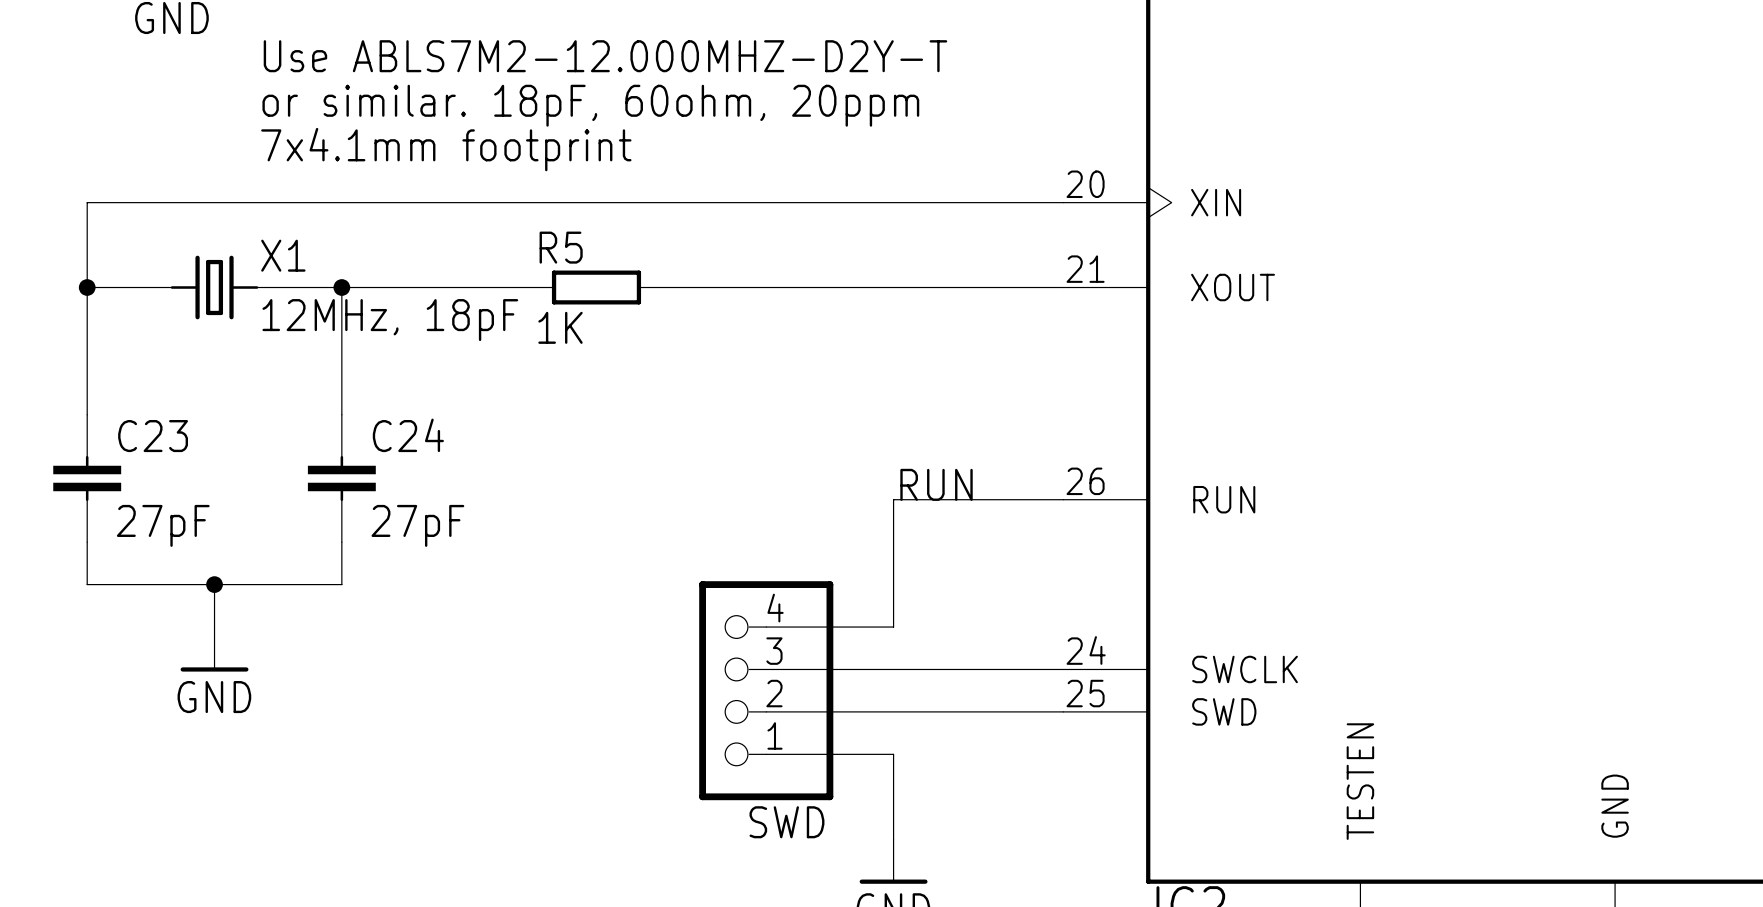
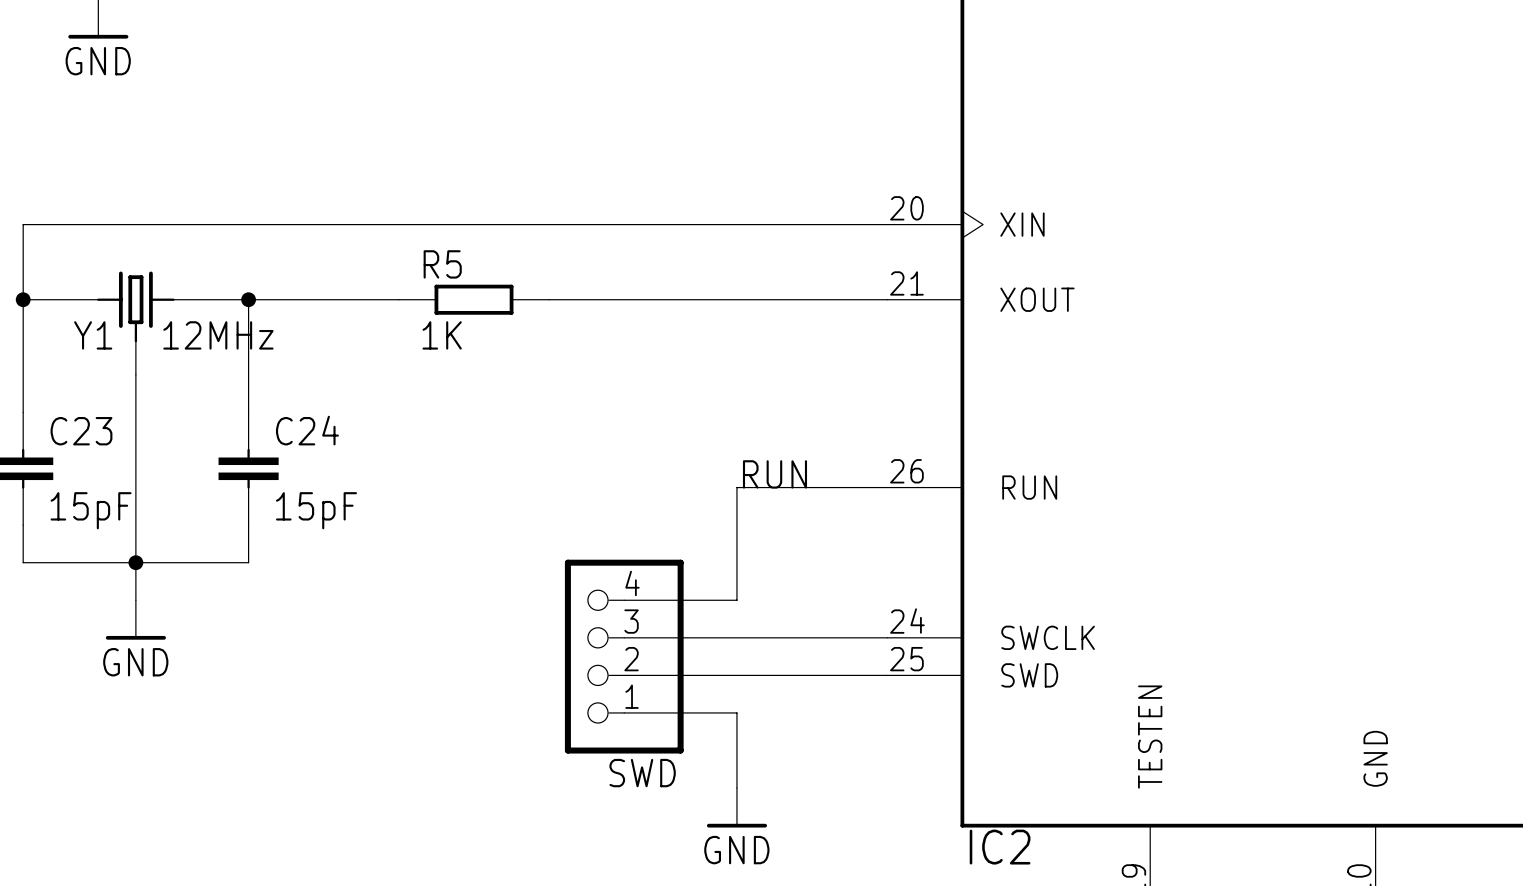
text: Use ABLS7M2-12.000MHZ-D2Y-T (605, 56) -> none
text: or similar. 18pF, 60ohm, 20ppm (590, 105) -> none
text: 7x4.1mm footprint (446, 149) -> none
X1: 12MHz, 18pF (214, 287) -> none
Y1: none -> 12MHz (135, 323)
wire: none -> (135, 374) (135, 562)
C23 value: 27pF (163, 525) -> 15pF (91, 510)
C24 value: 27pF (417, 525) -> 15pF (316, 510)

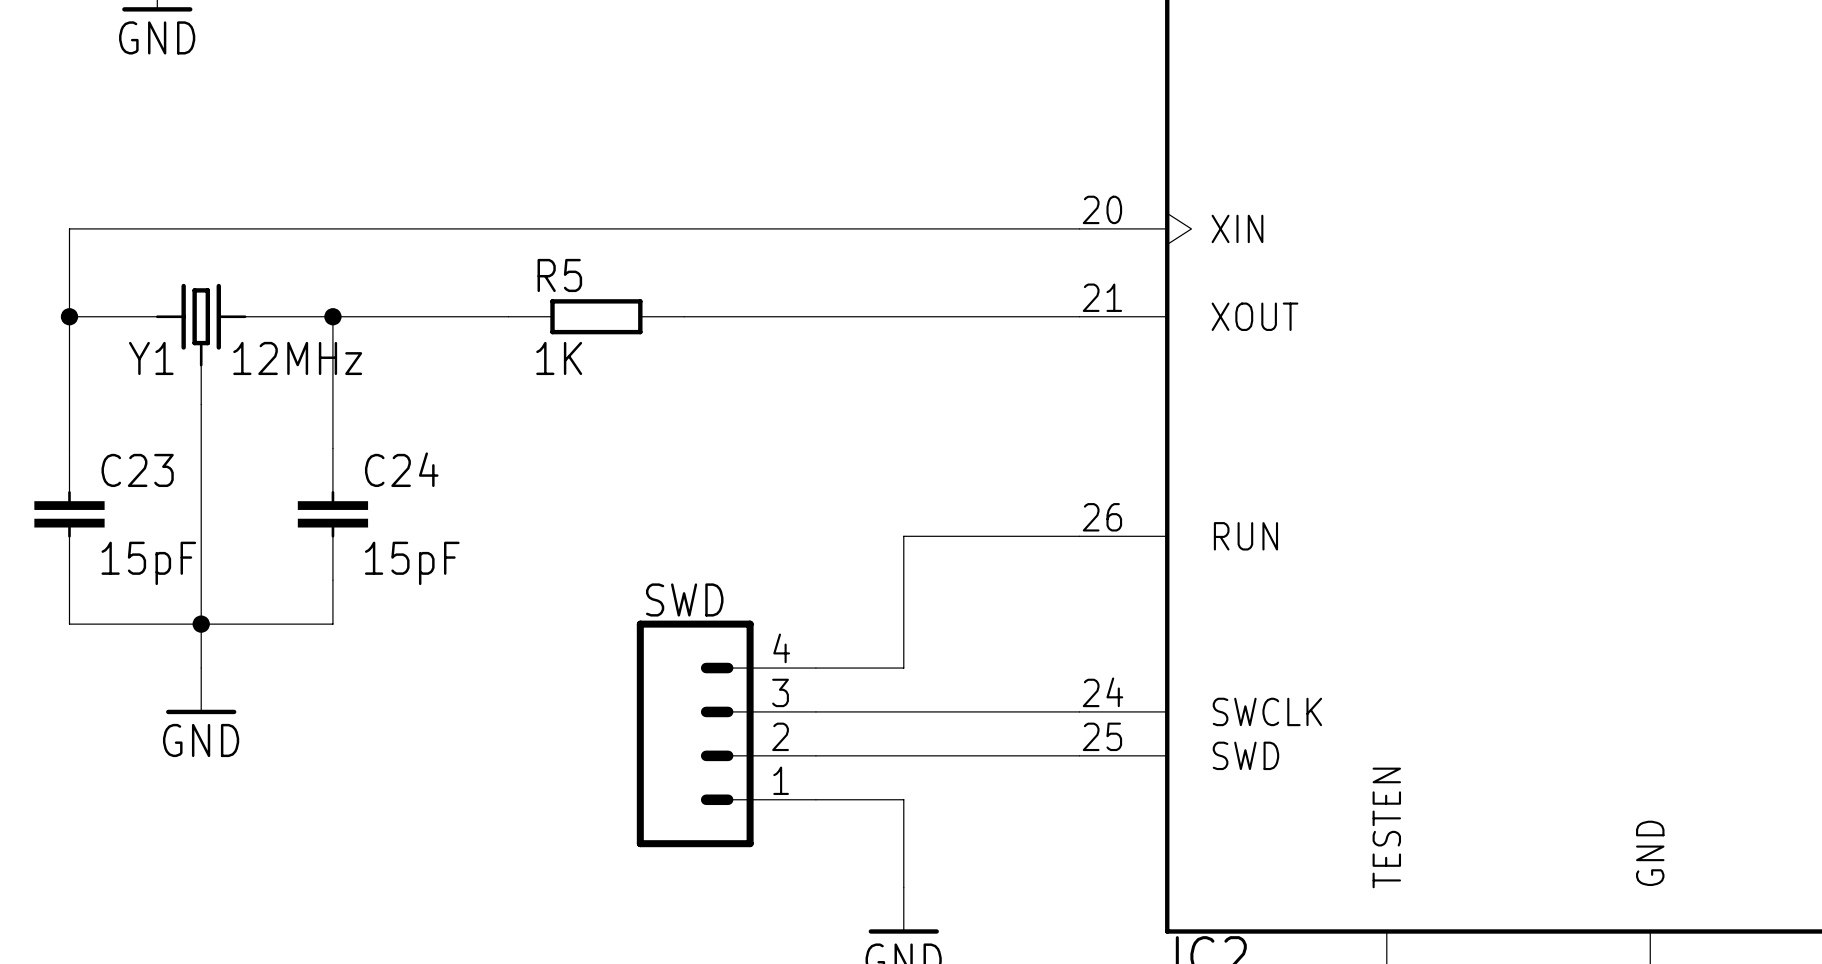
label: RUN (774, 474) -> none
SWD: none -> (726, 733)
SWD: (624, 656) -> none

